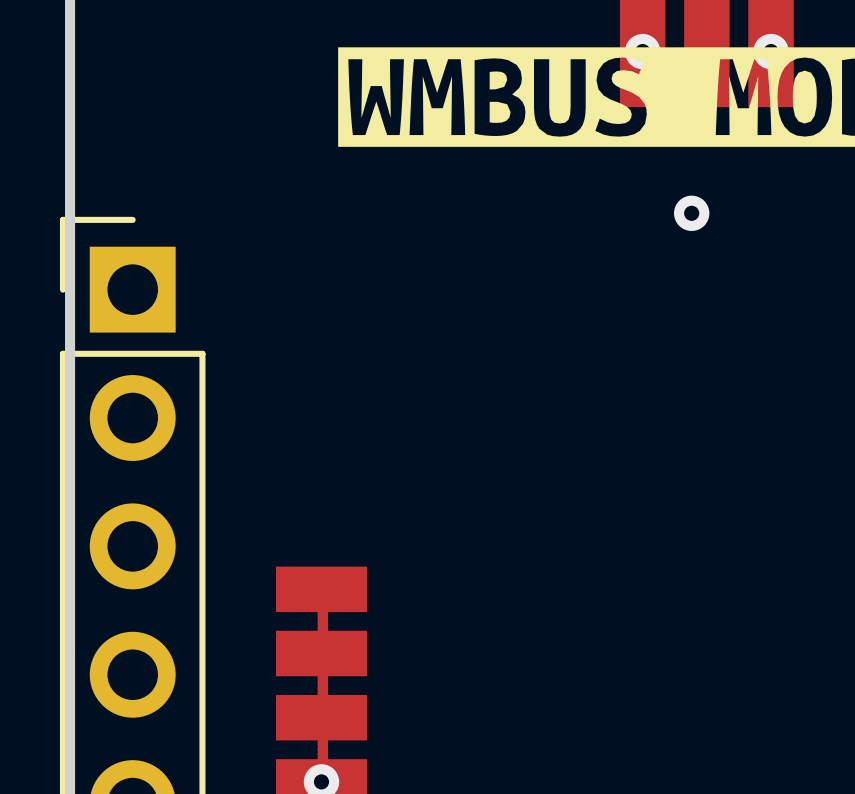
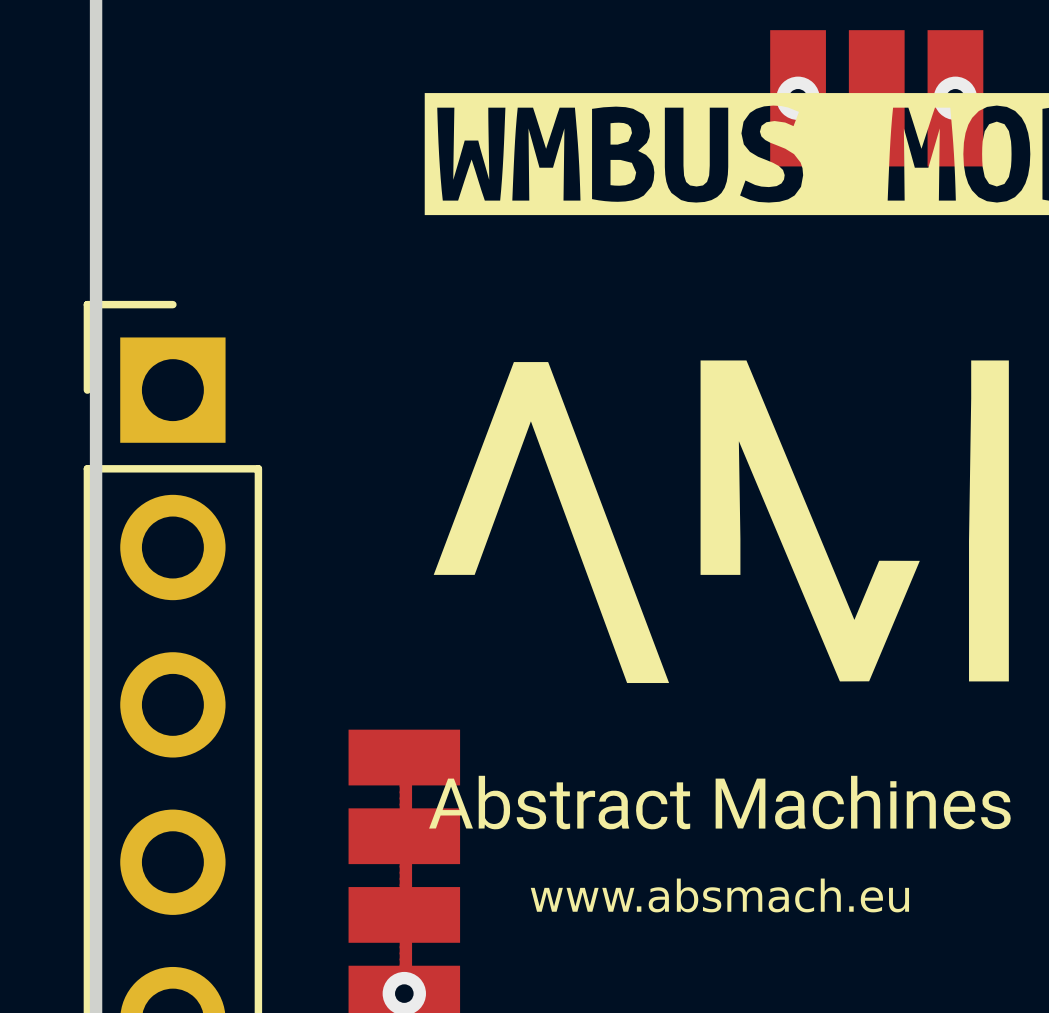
via: (691, 213) -> none
drawing: none -> [433, 360, 1009, 684]
drawing: none -> [429, 775, 1011, 913]

